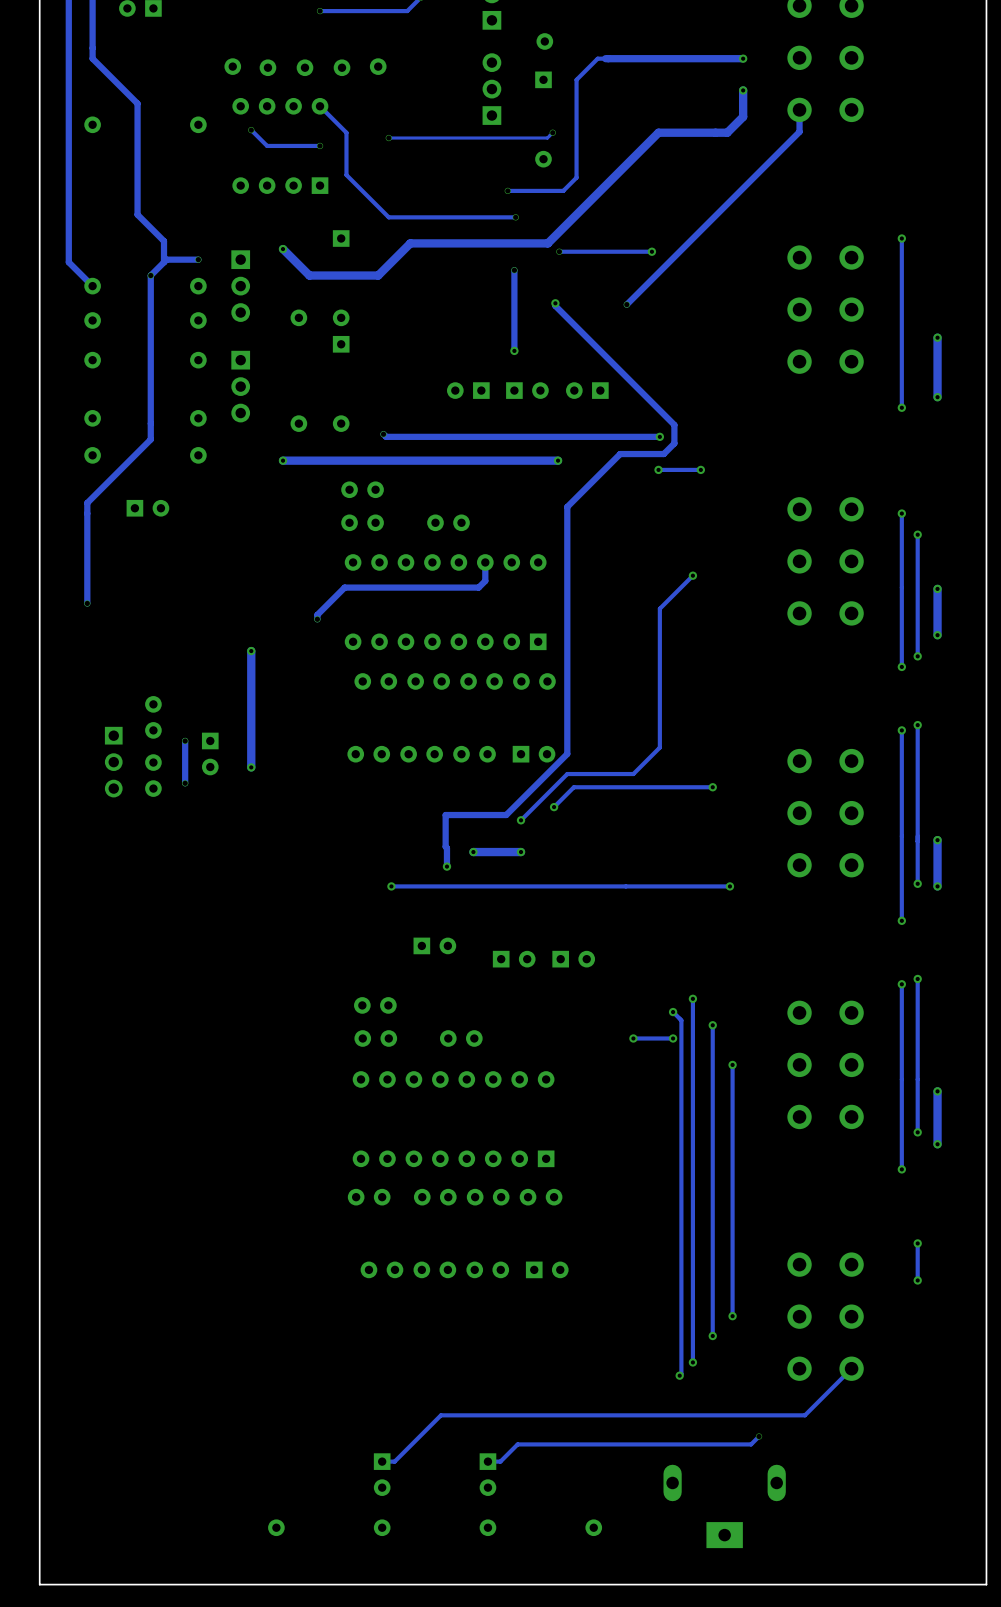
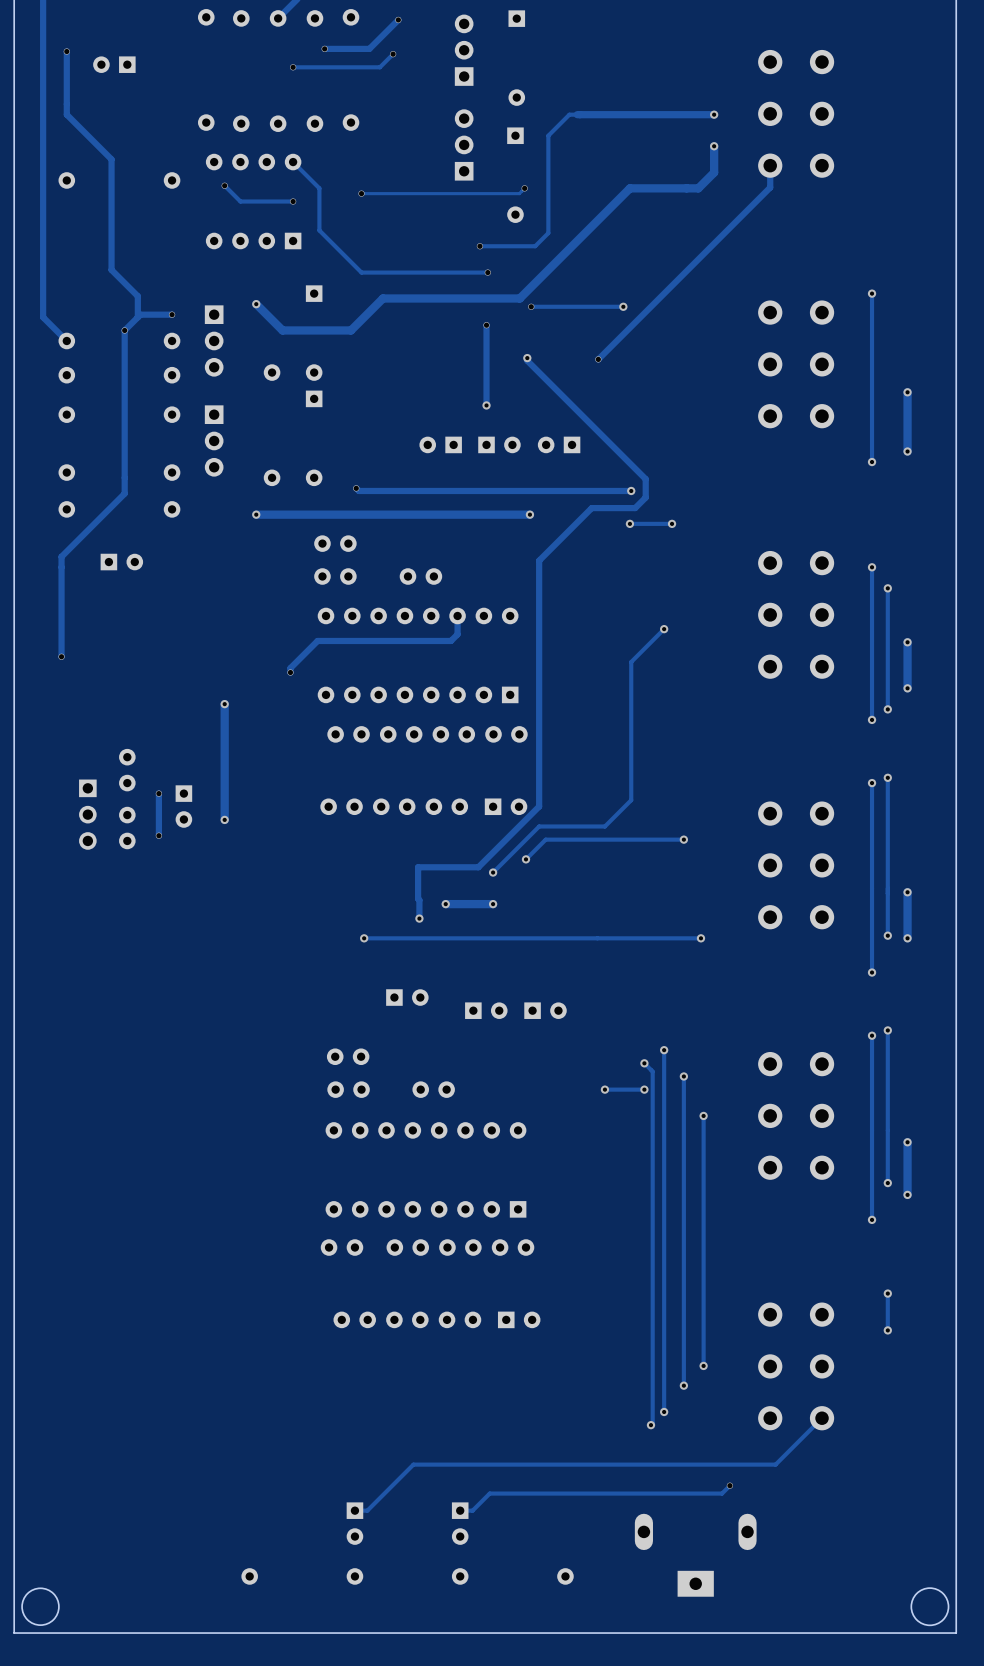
round board edge: none -> [21, 1587, 60, 1626]
round board edge: none -> [910, 1587, 950, 1627]

